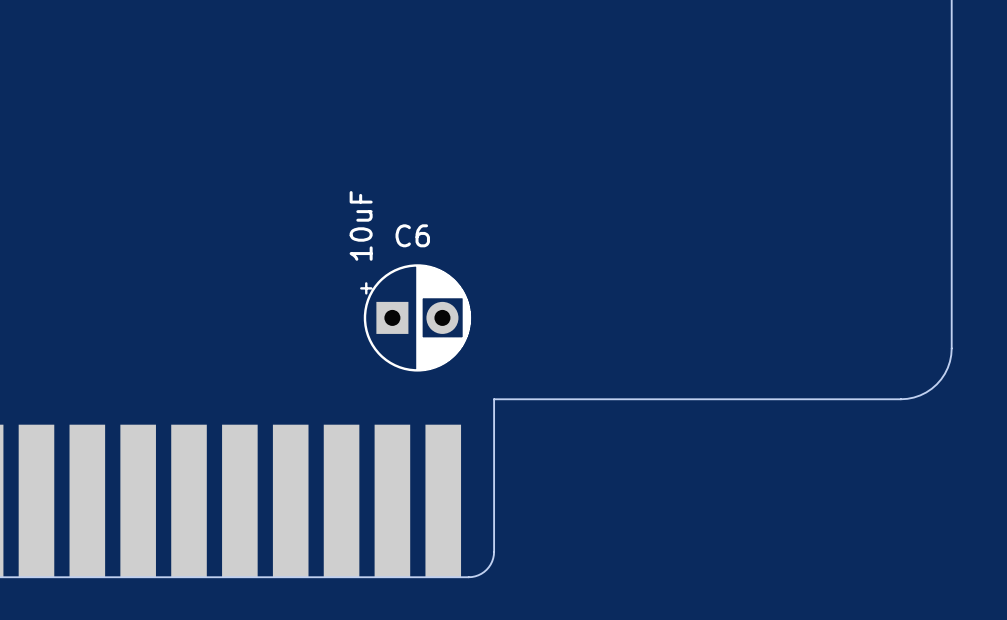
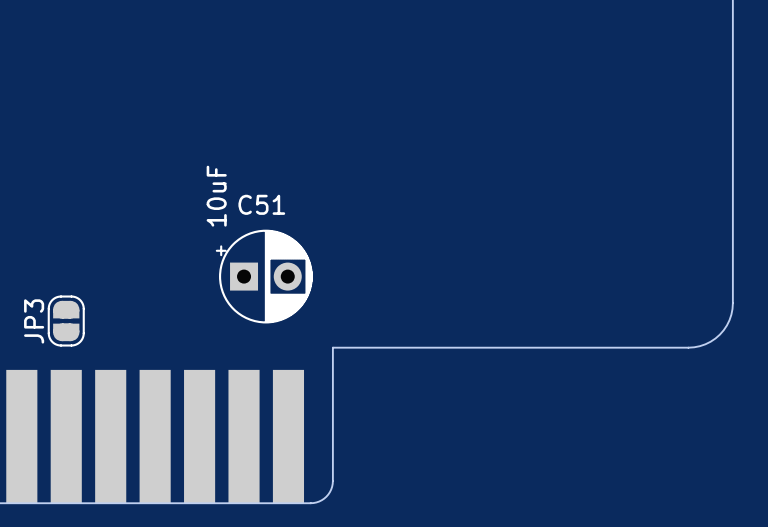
C6 name: C6 (412, 235) -> C51 (261, 204)
JP3: none -> (66, 321)

